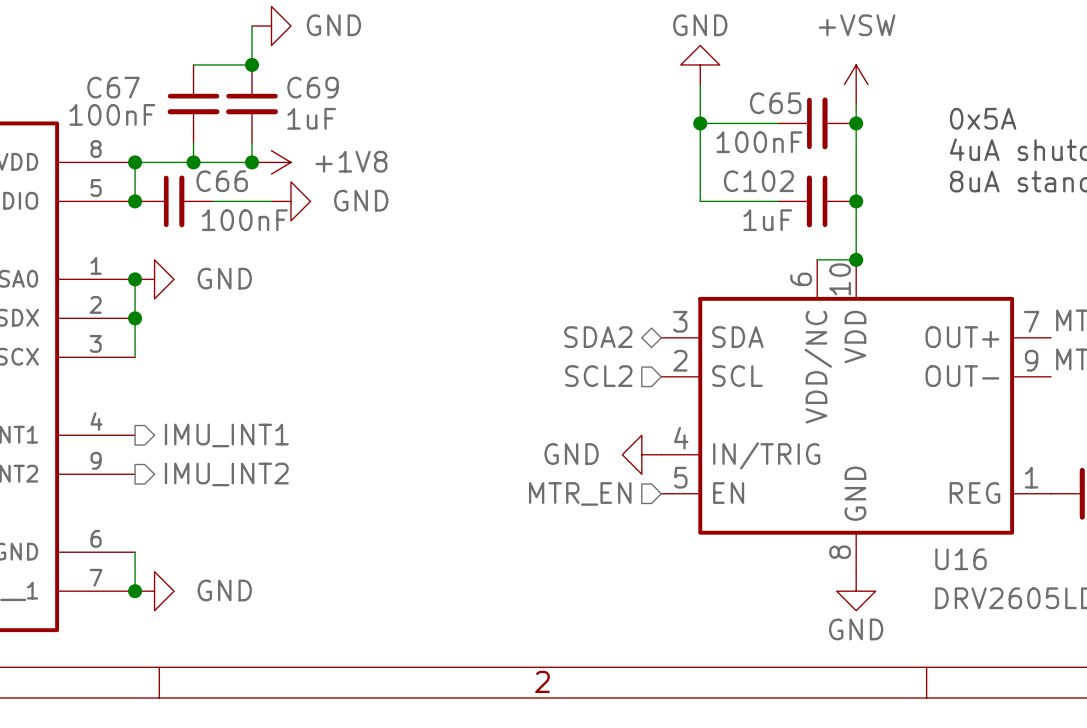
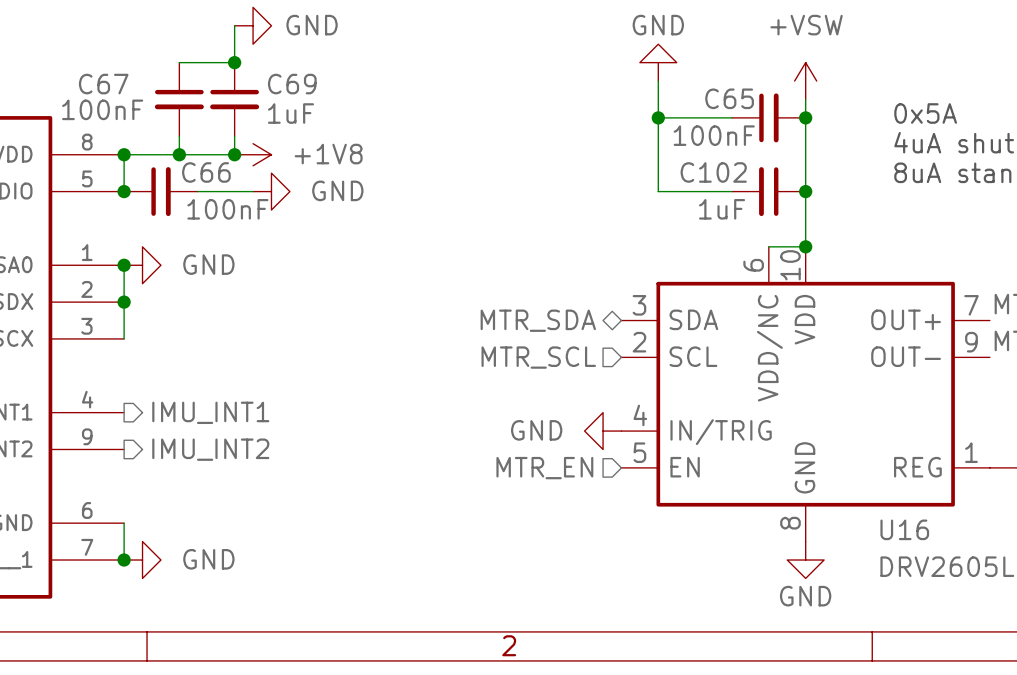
hierarchical label: SDA2 (598, 337) -> MTR_SDA (538, 320)
hierarchical label: SCL2 (598, 376) -> MTR_SCL (538, 357)

